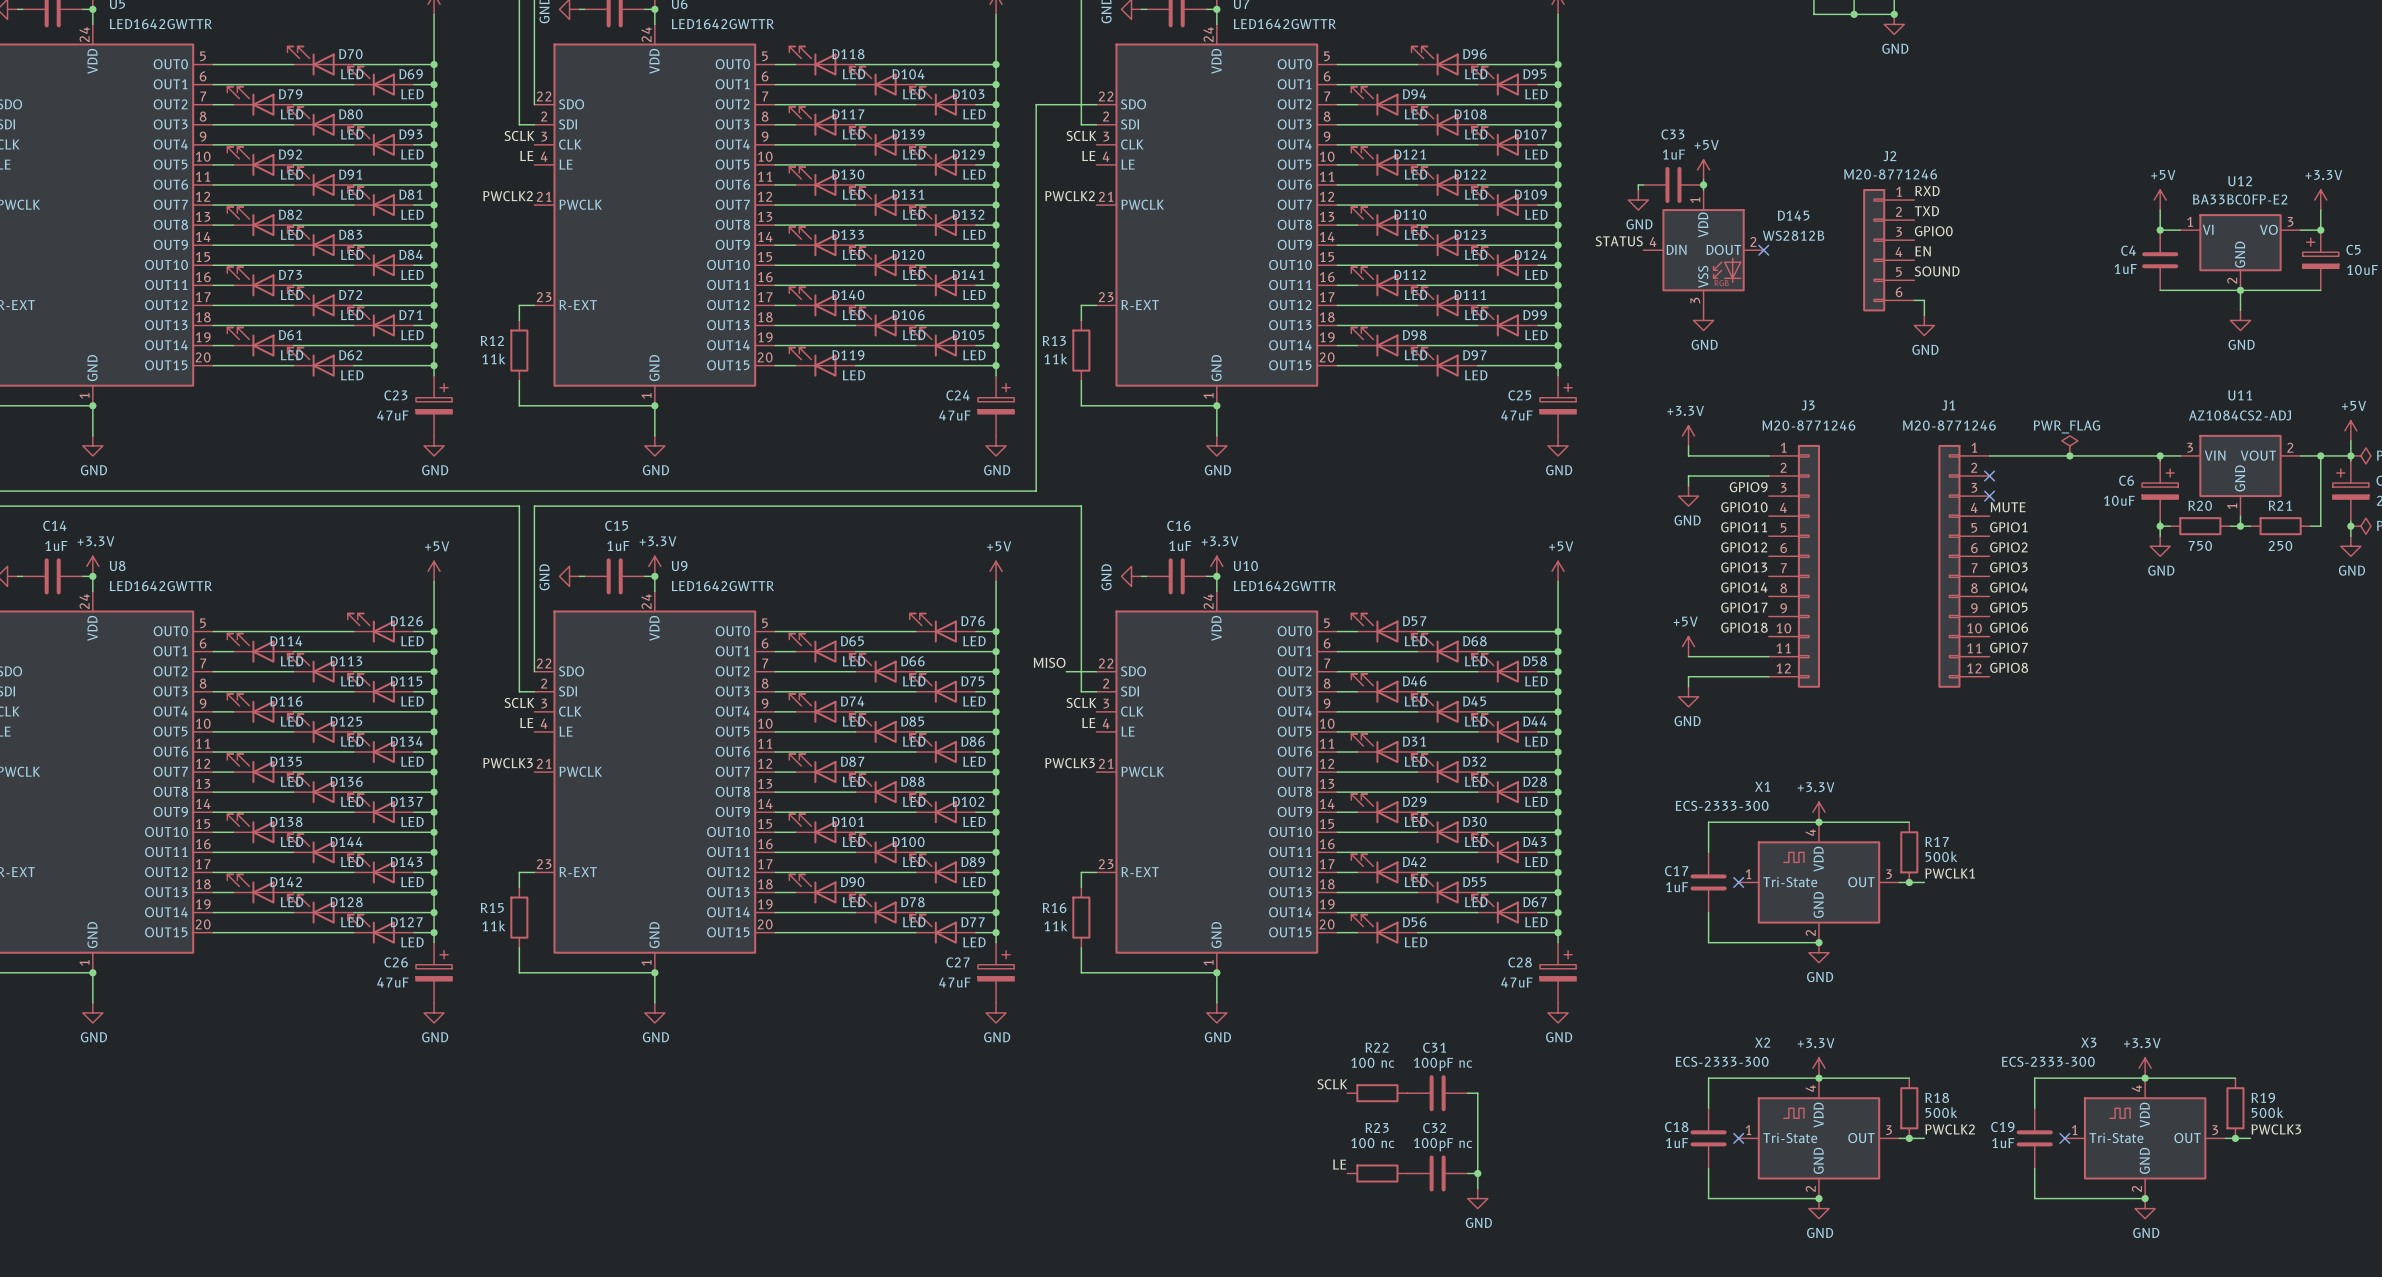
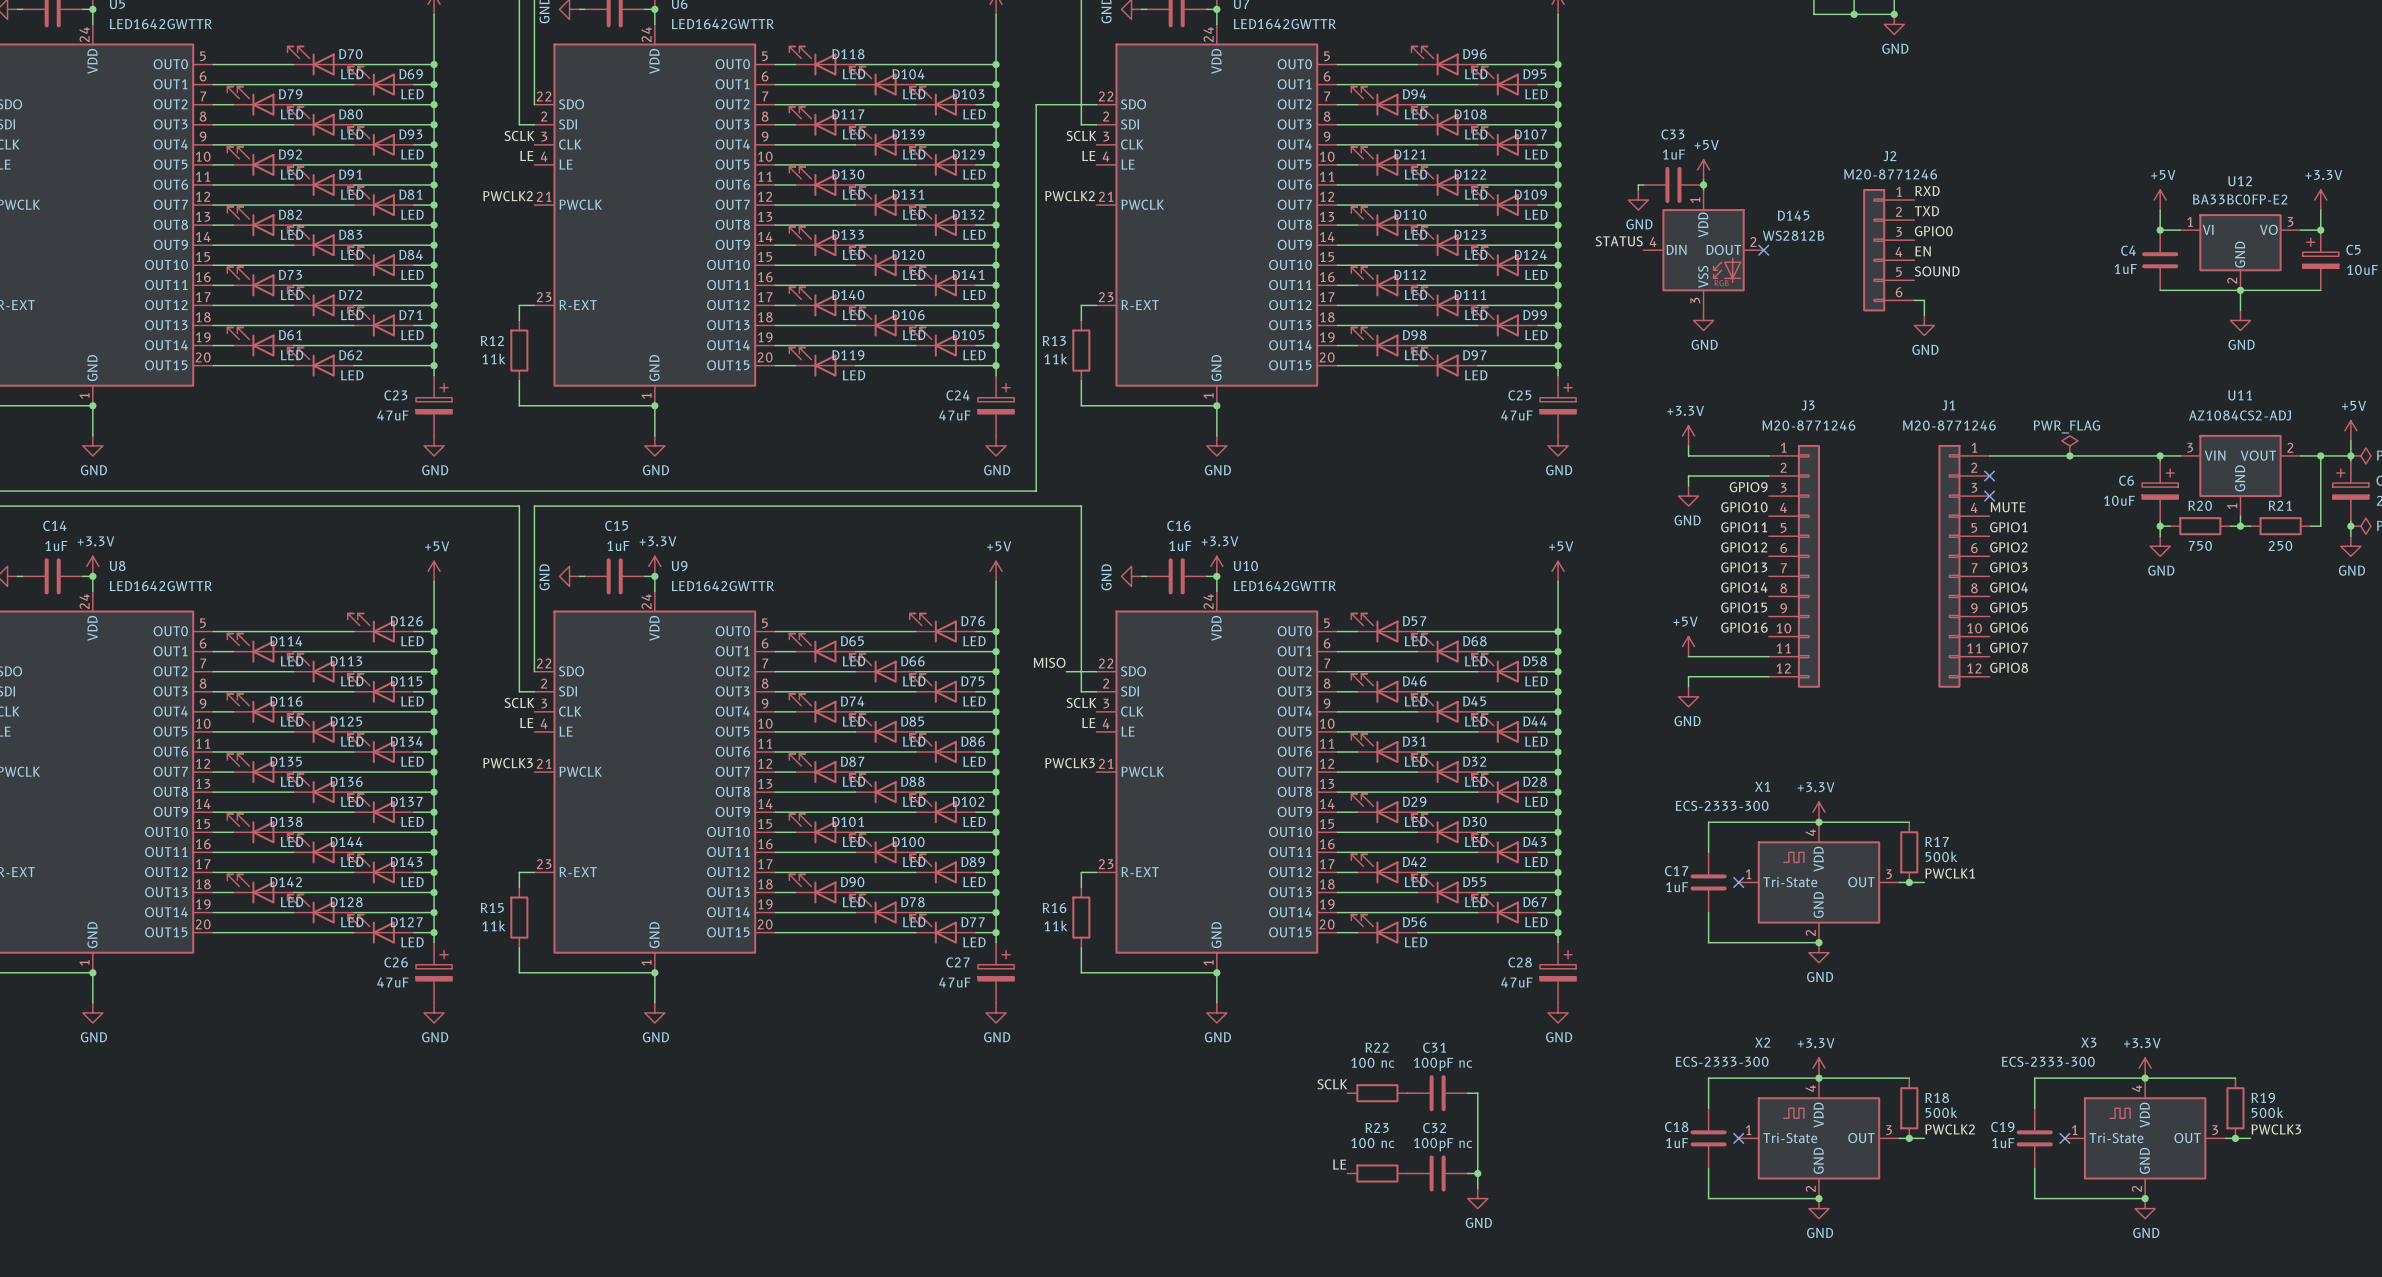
label: GPIO17 (1744, 607) -> GPIO15 (1744, 607)
label: GPIO18 (1744, 627) -> GPIO16 (1744, 627)

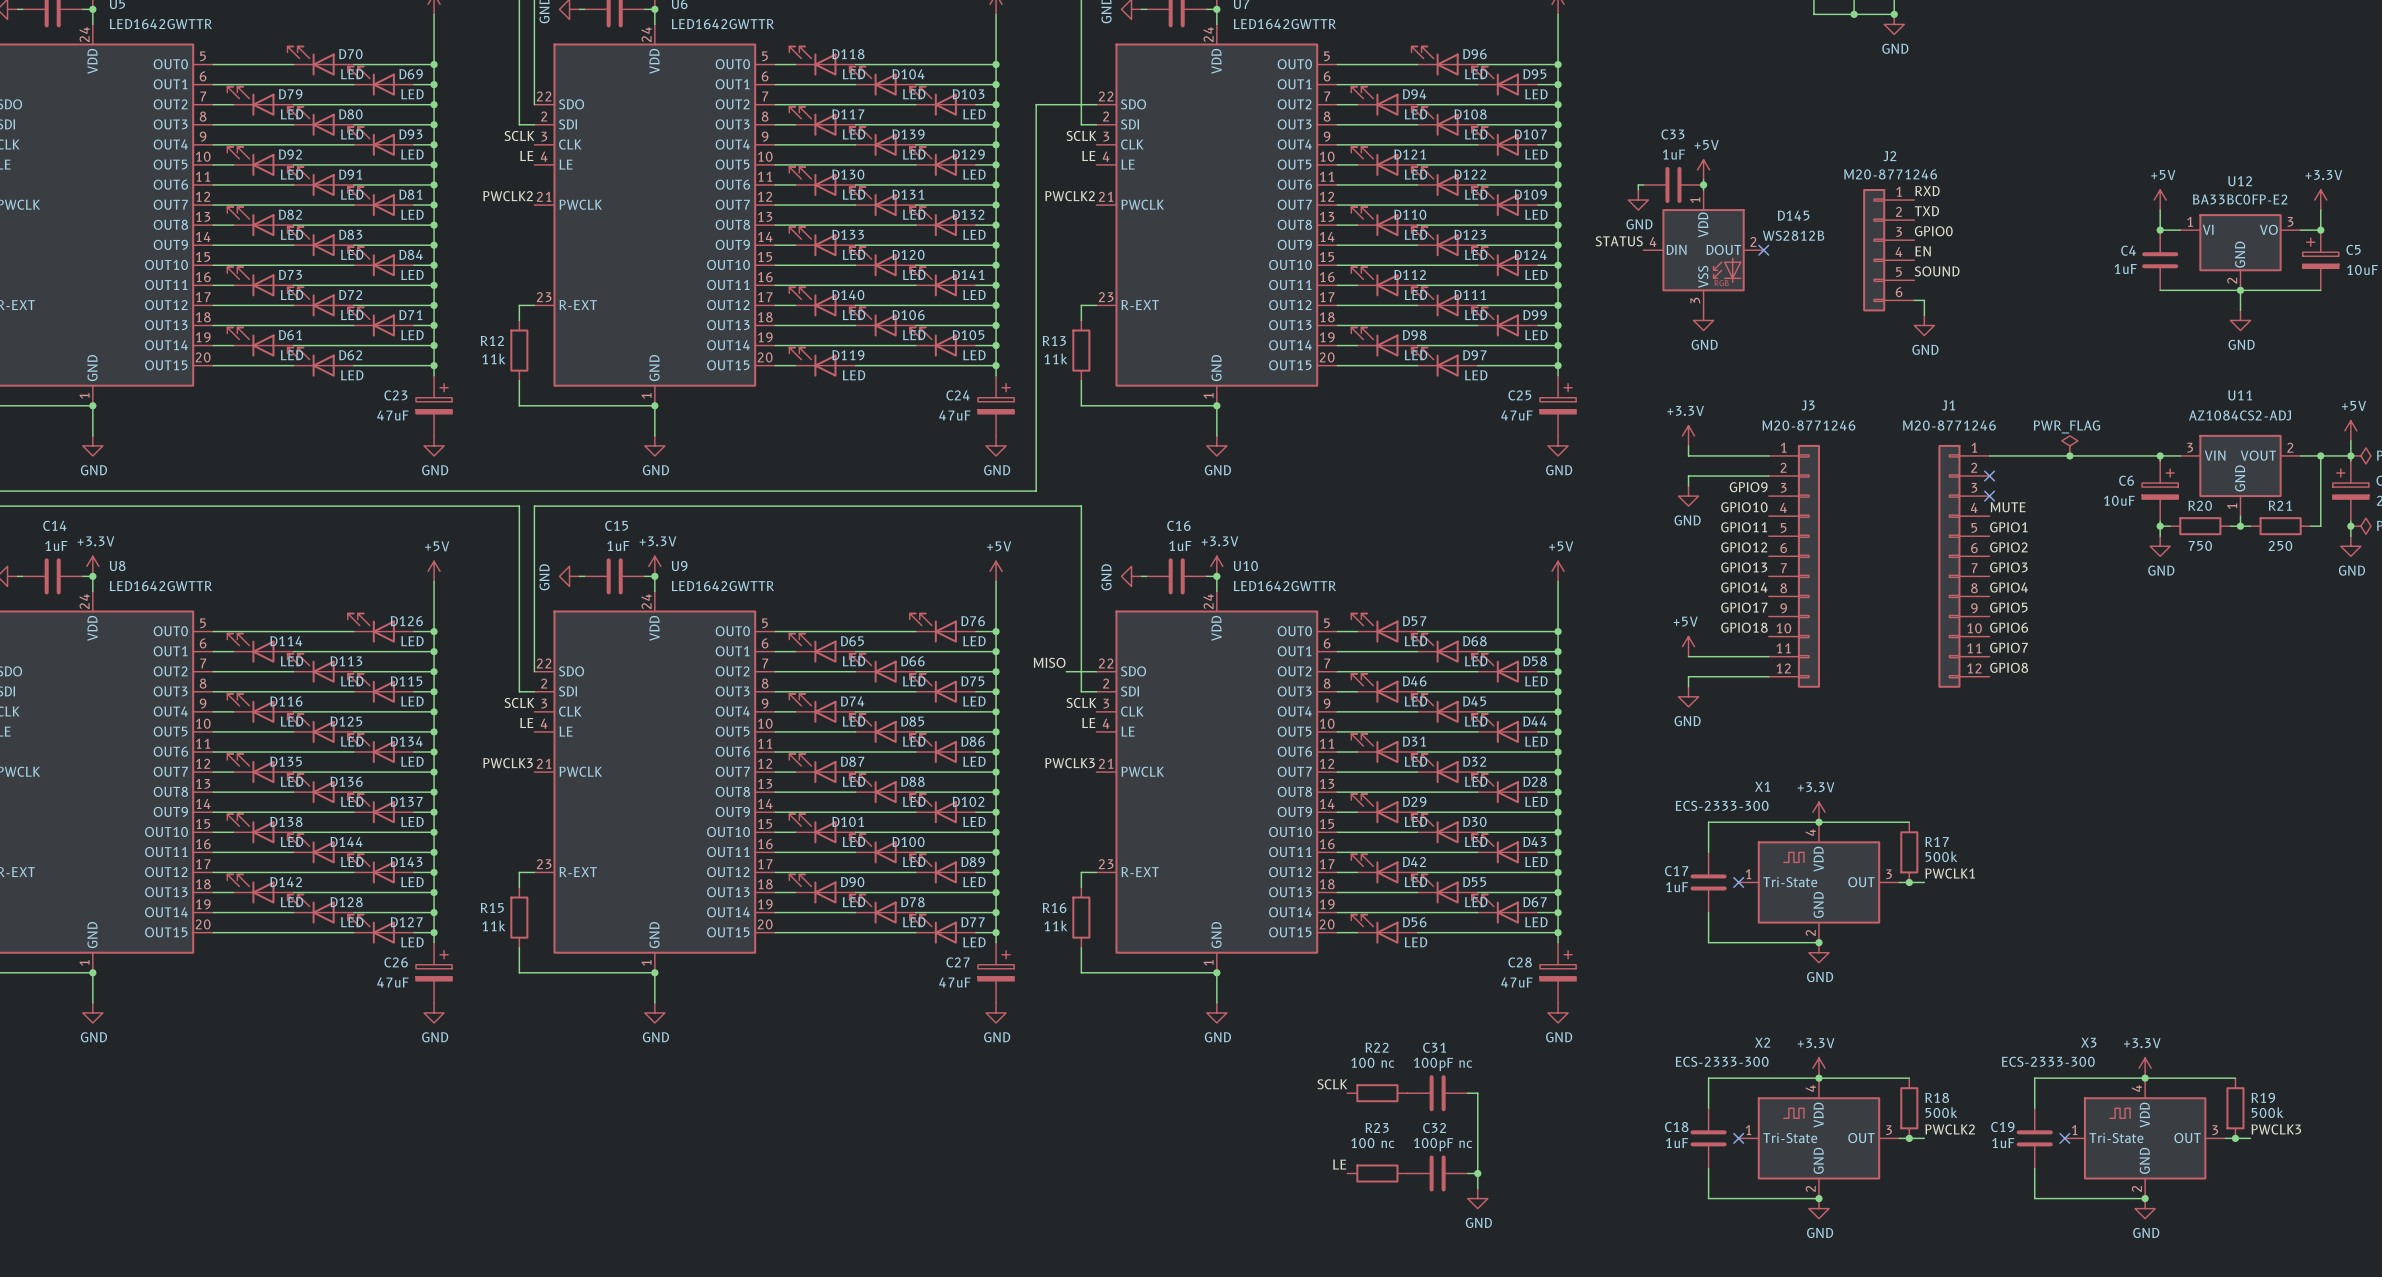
label: GPIO15 (1744, 607) -> GPIO17 (1744, 607)
label: GPIO16 (1744, 627) -> GPIO18 (1744, 627)

